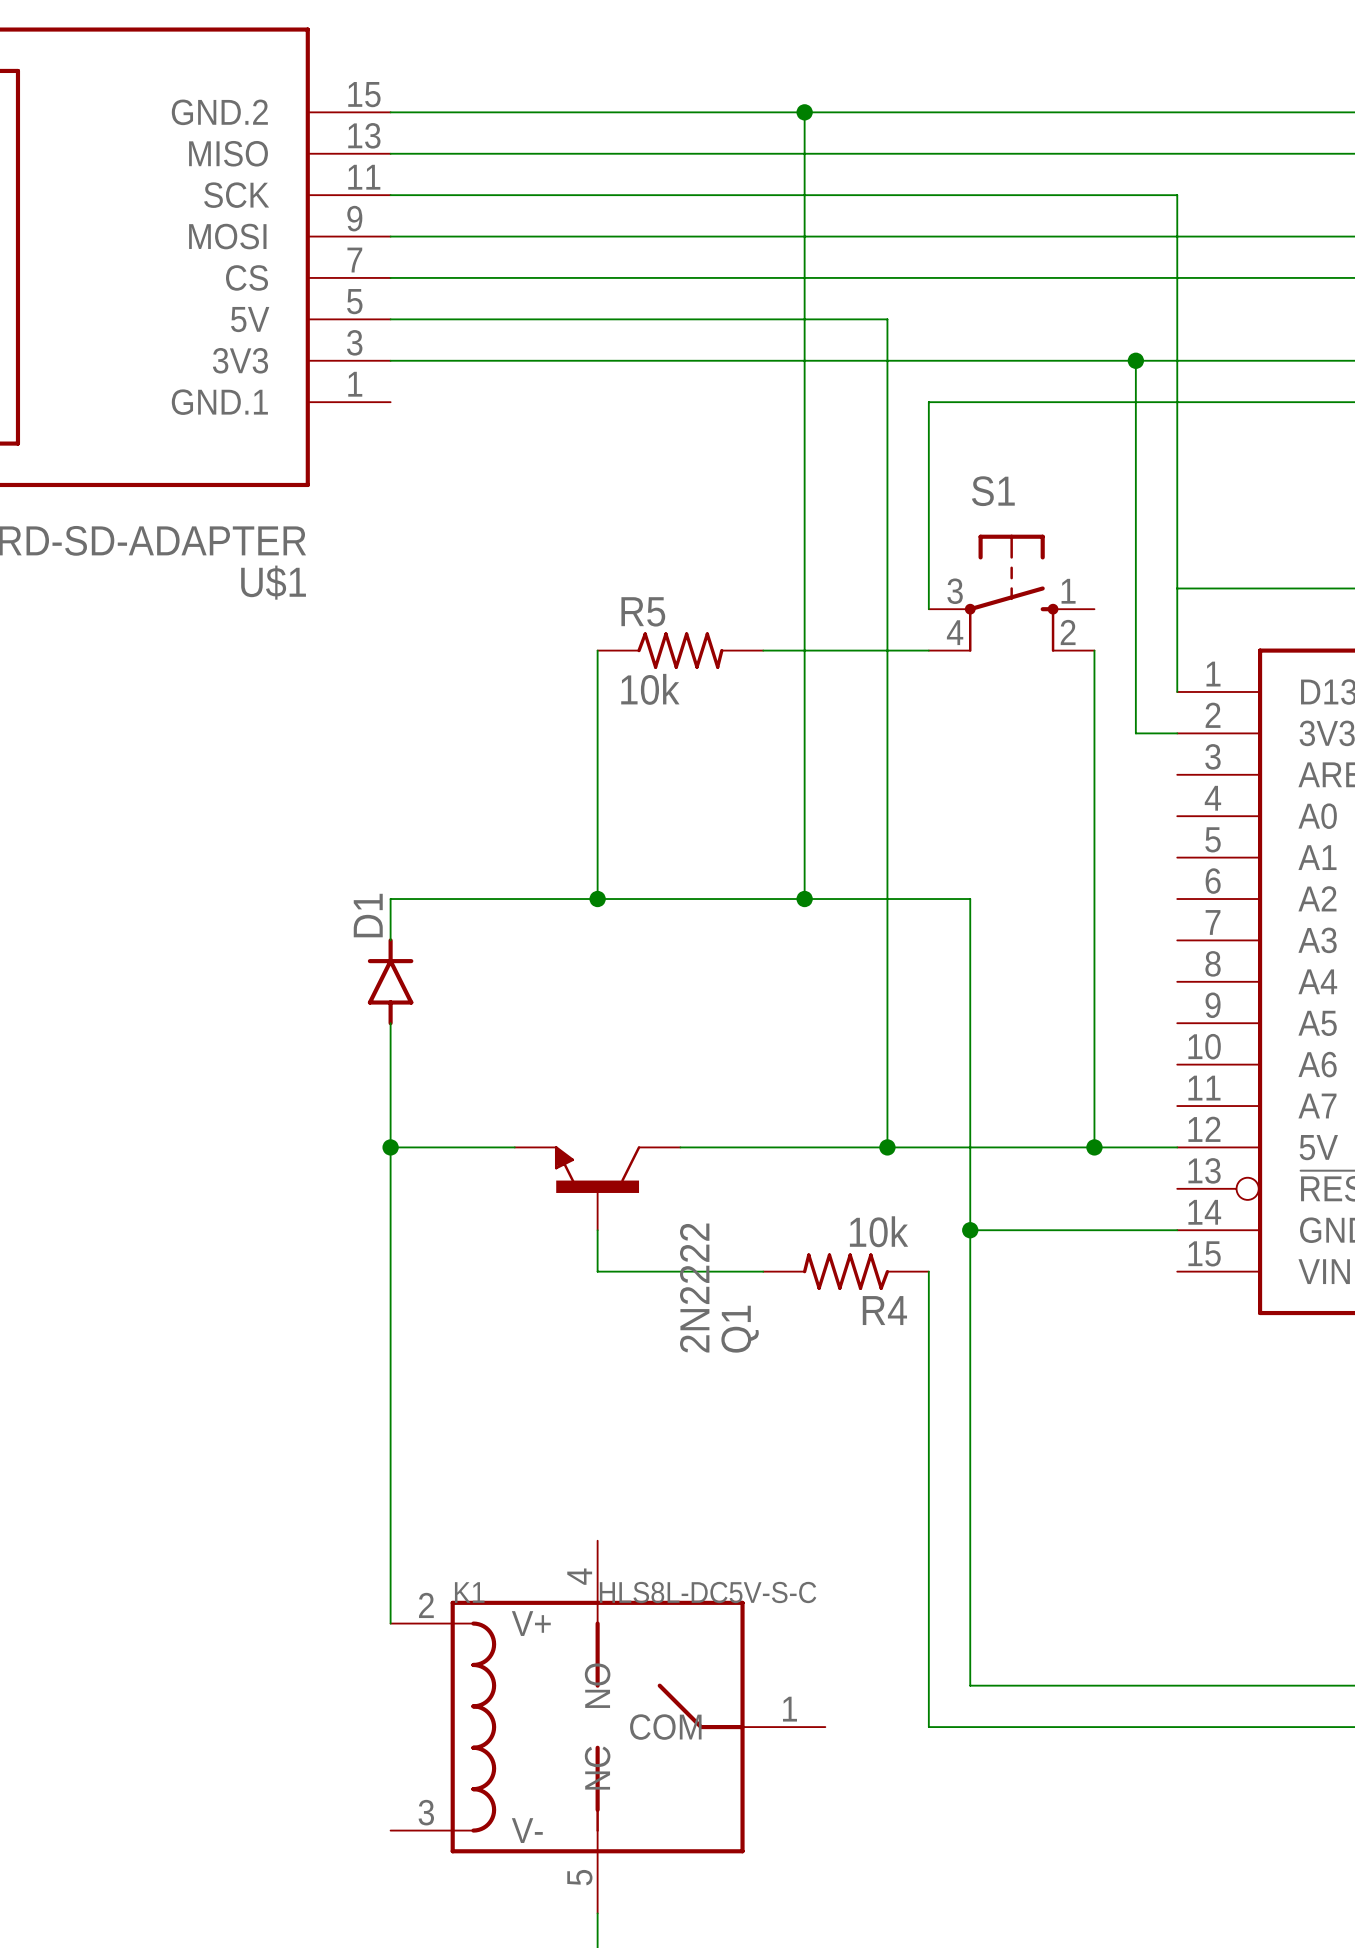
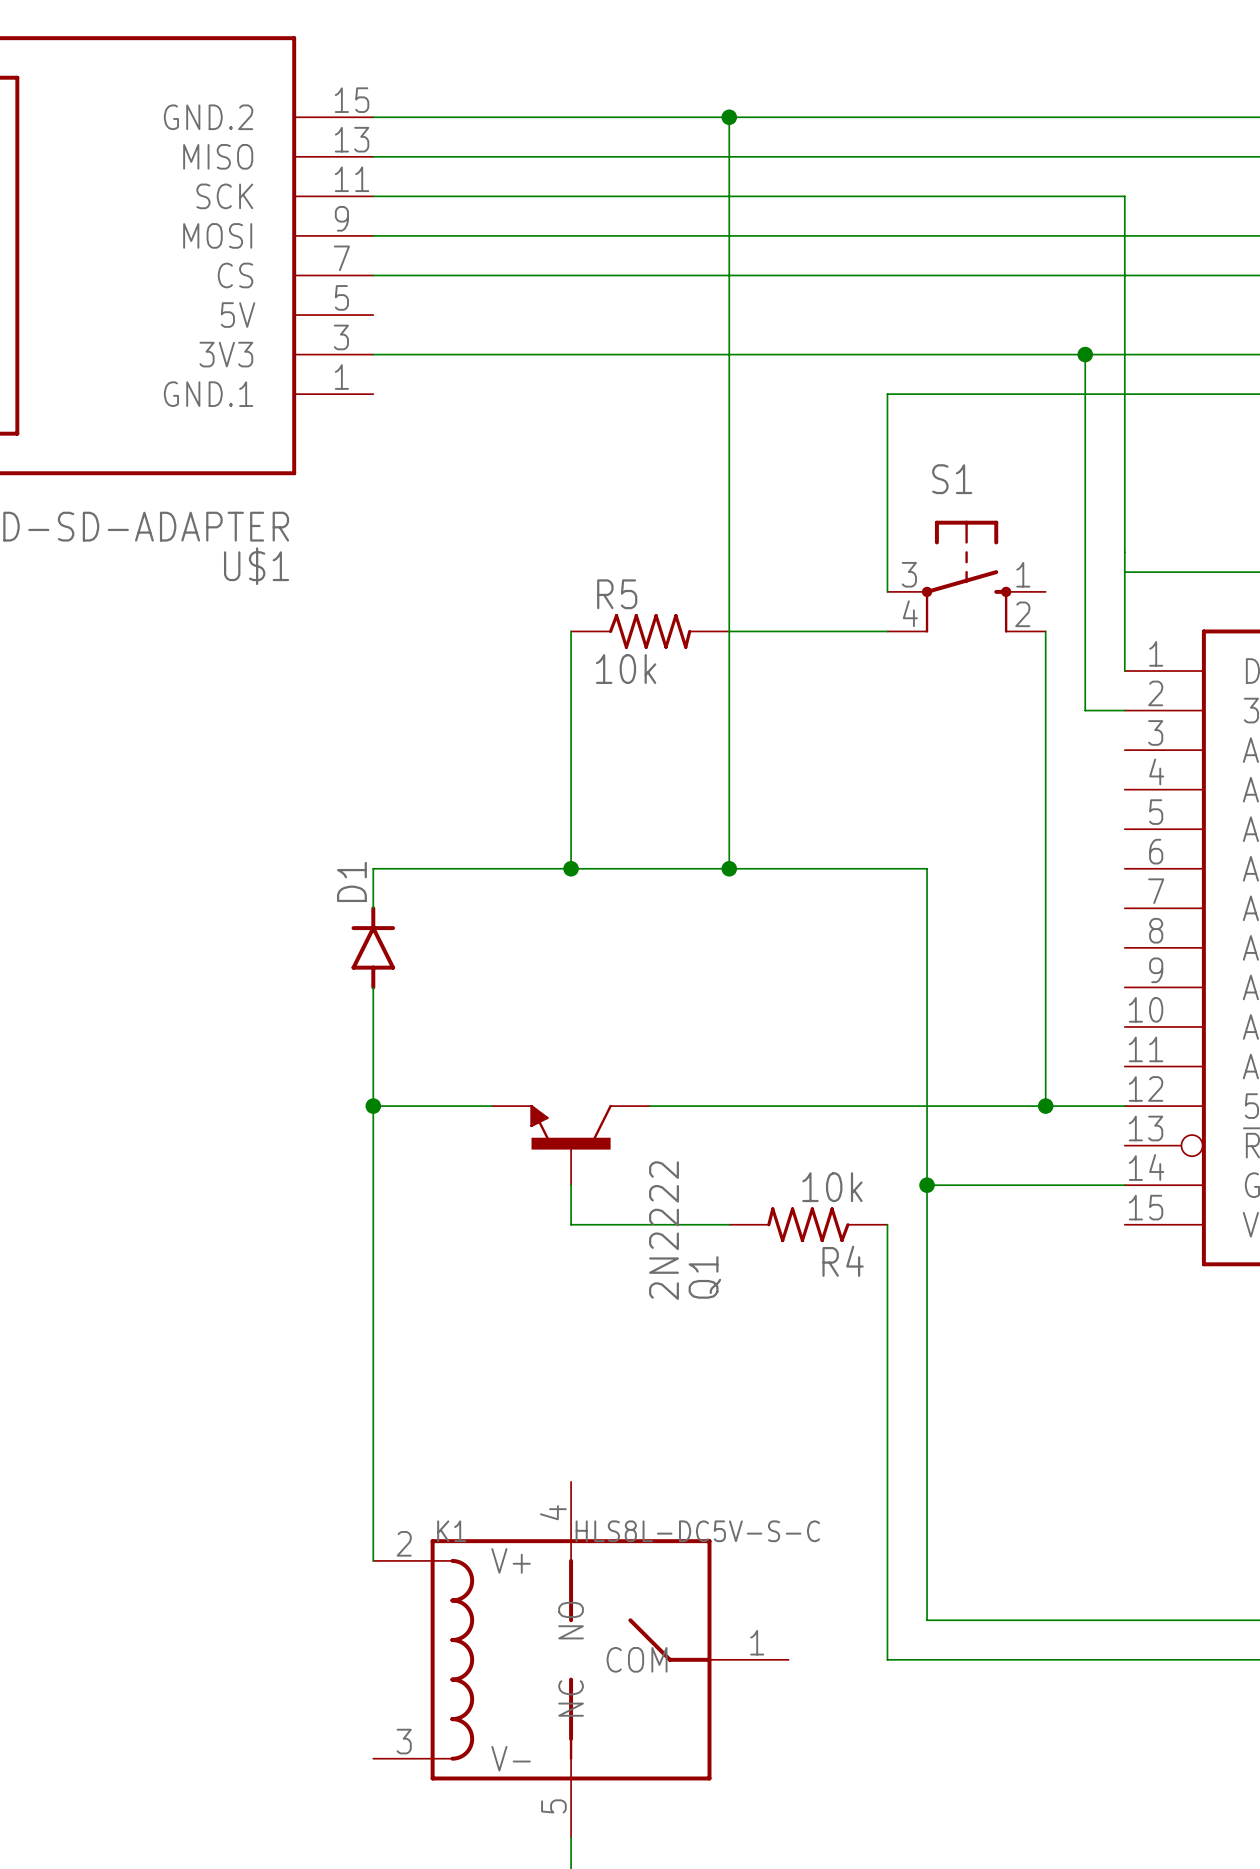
wire: (804, 112) (804, 899) -> (729, 117) (729, 868)
junction position: (804, 112) -> (729, 117)
wire: (390, 319) (887, 319) (887, 1147) -> none
junction position: (804, 899) -> (729, 868)
junction: (887, 1147) -> none

